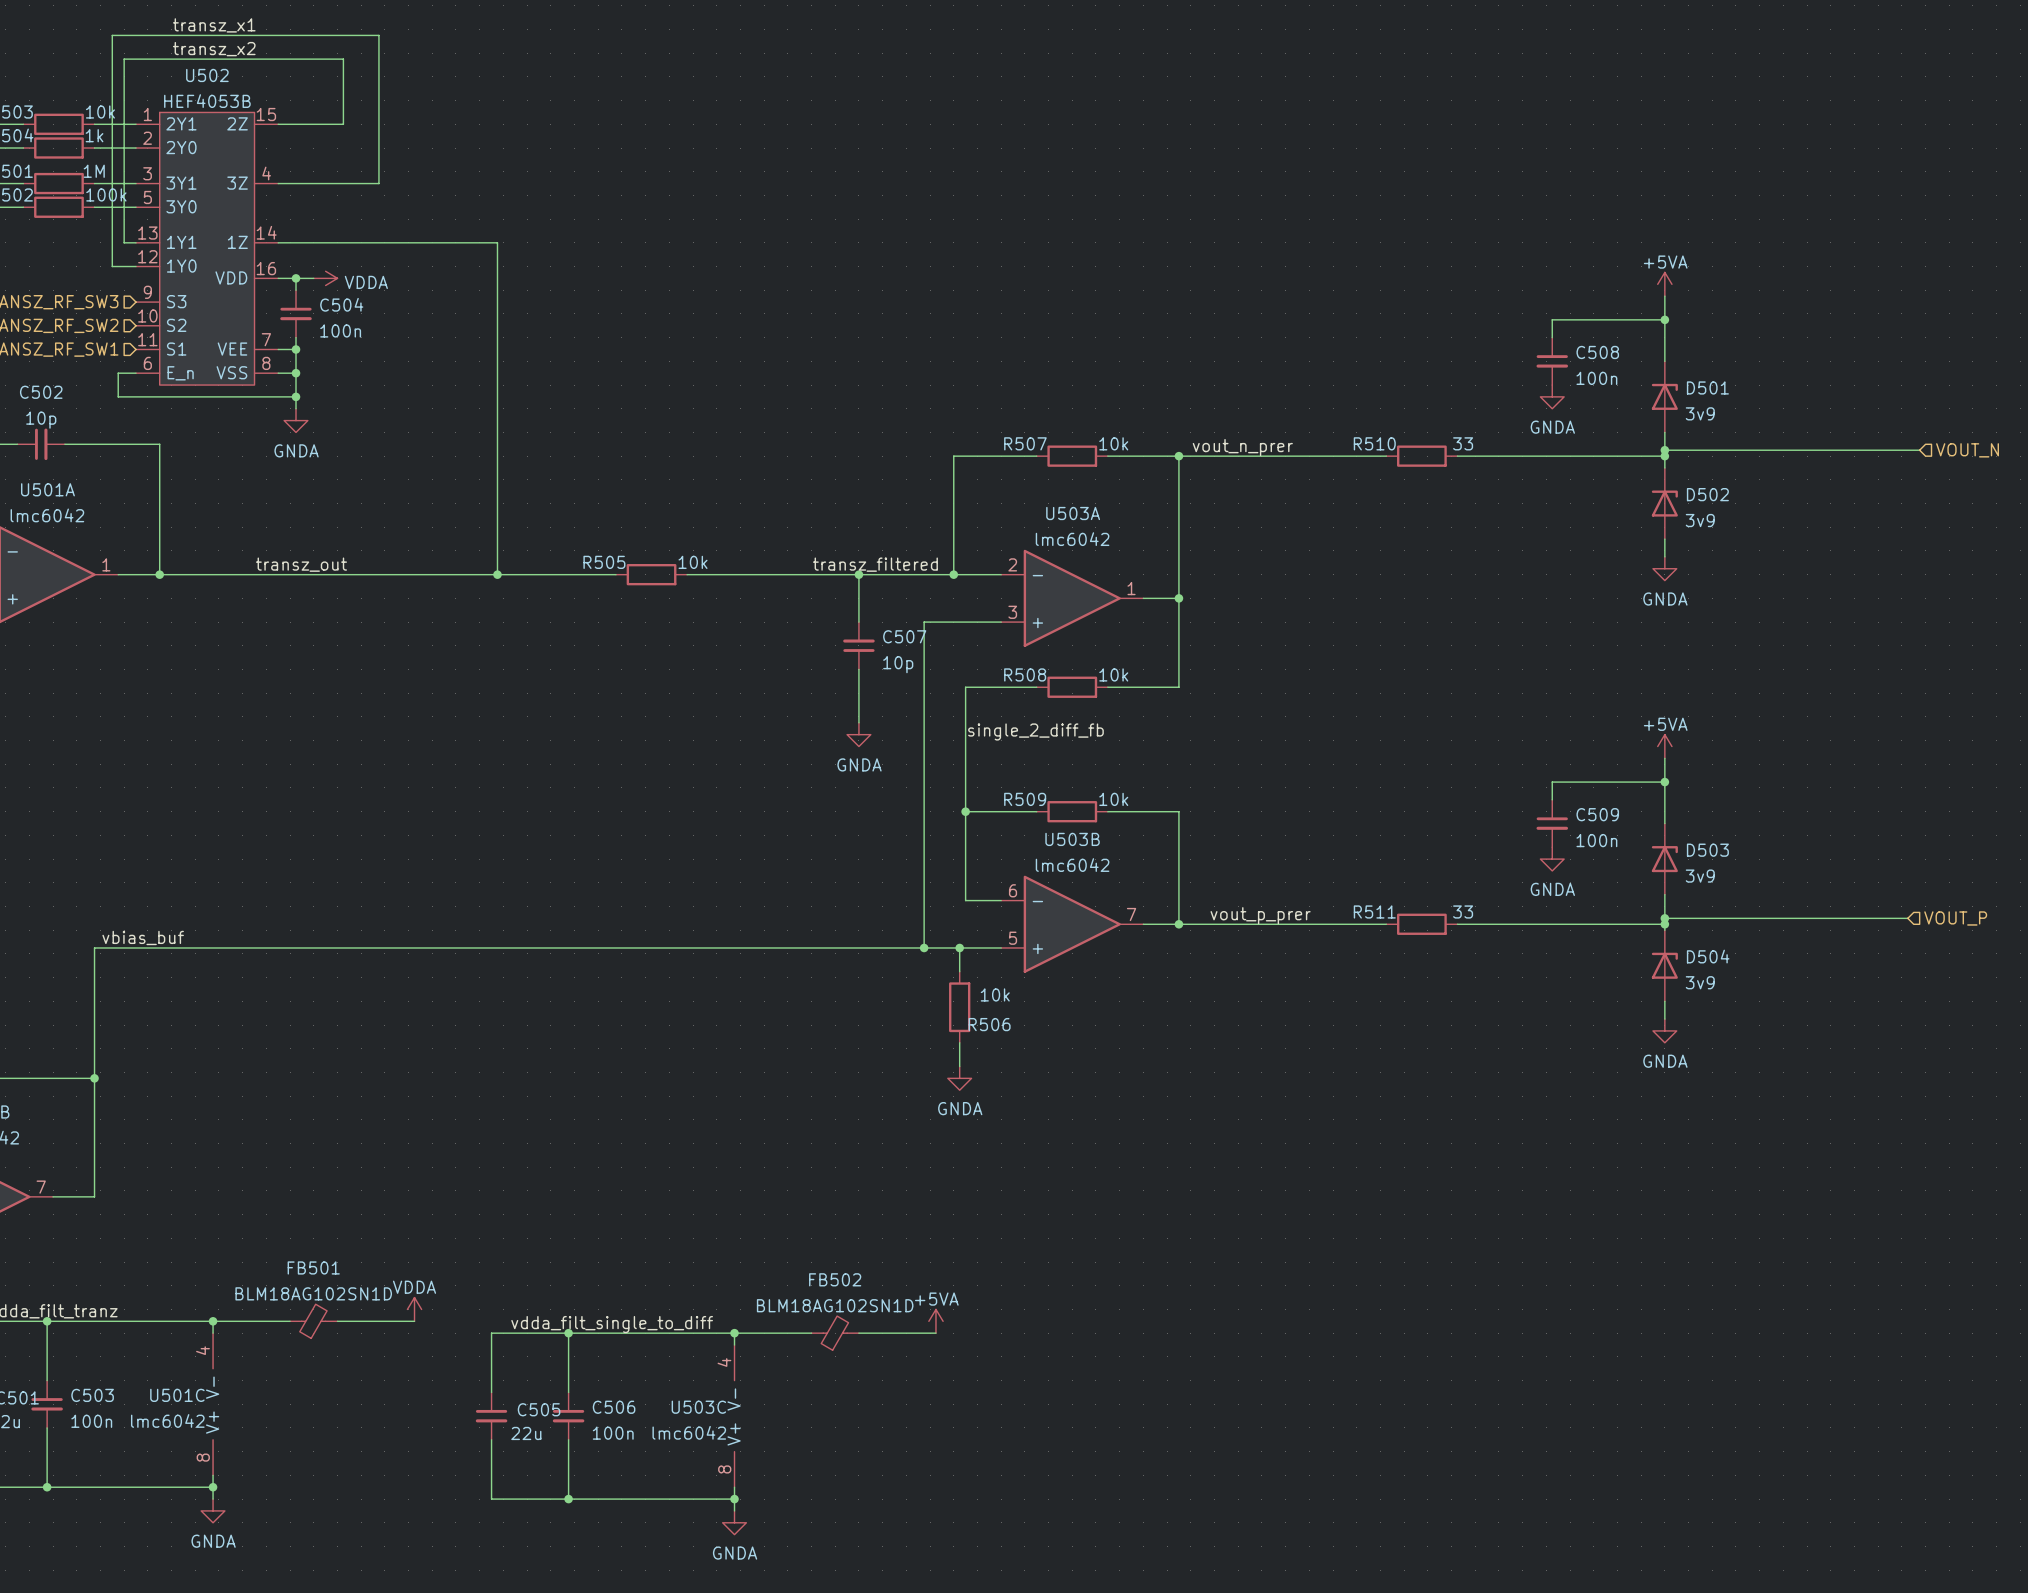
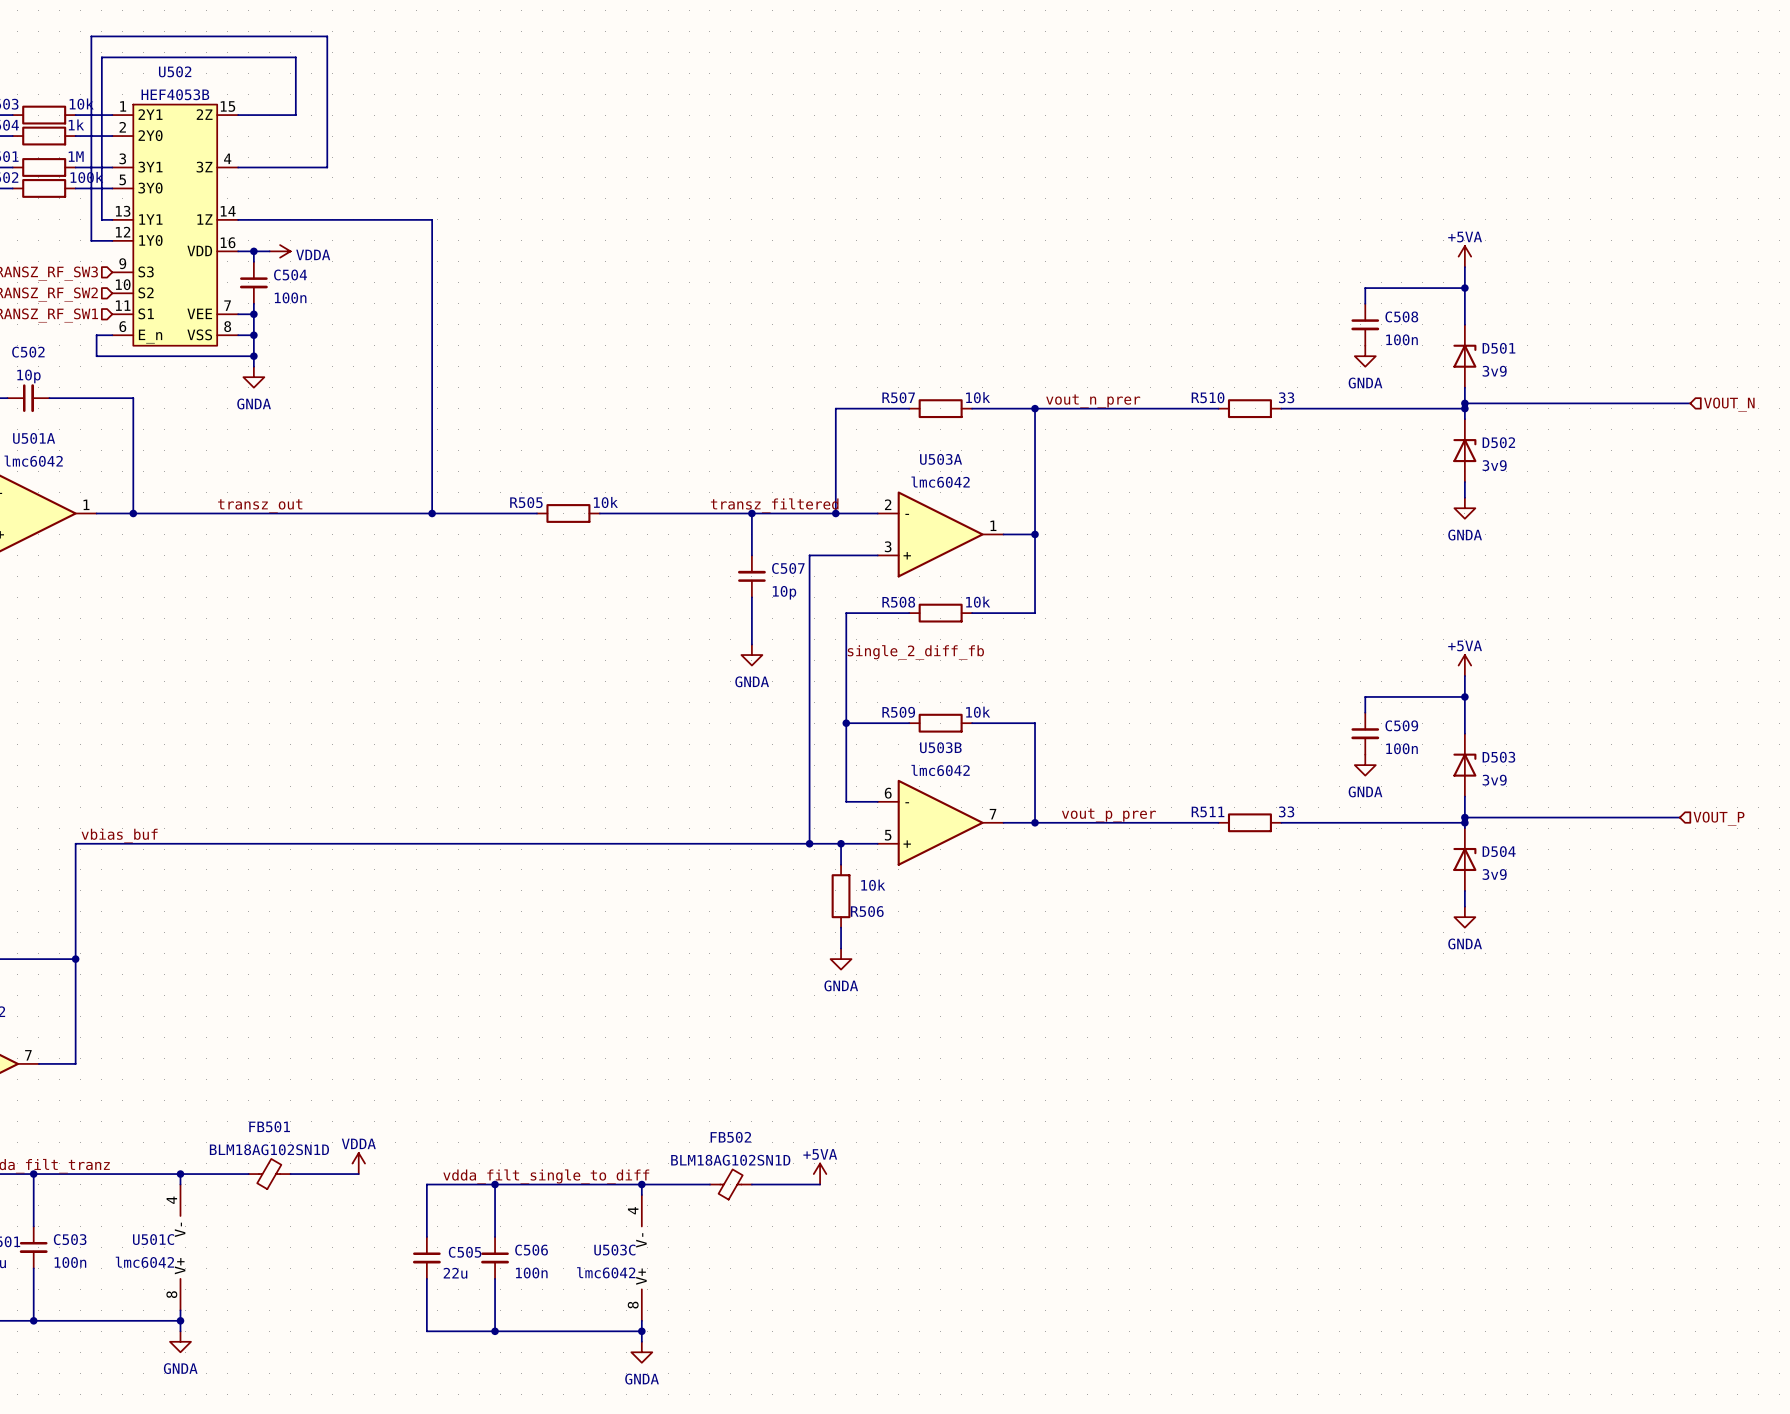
label: transz_x1 (214, 25) -> none
label: transz_x2 (214, 49) -> none

